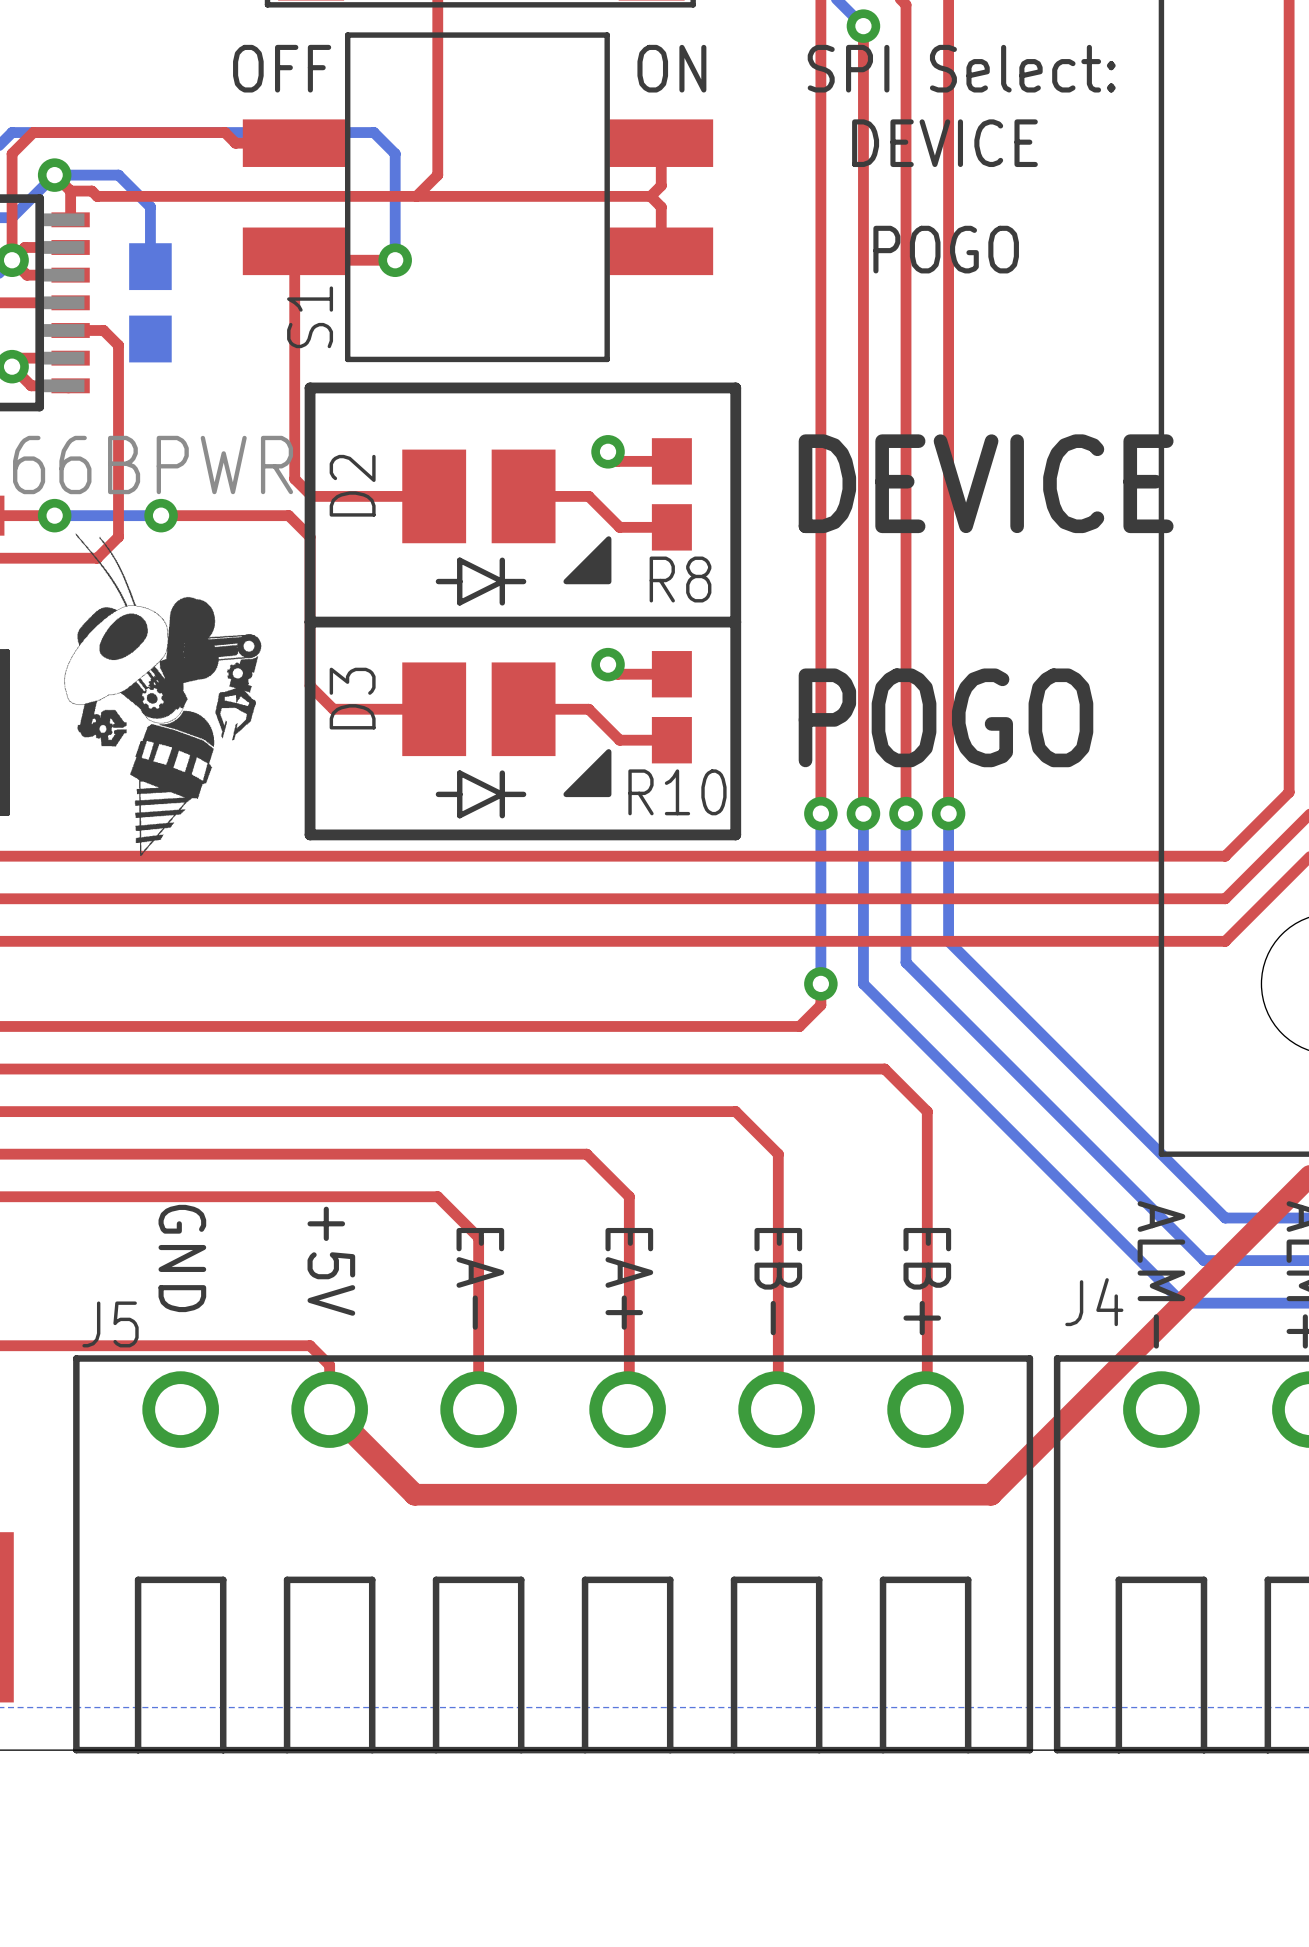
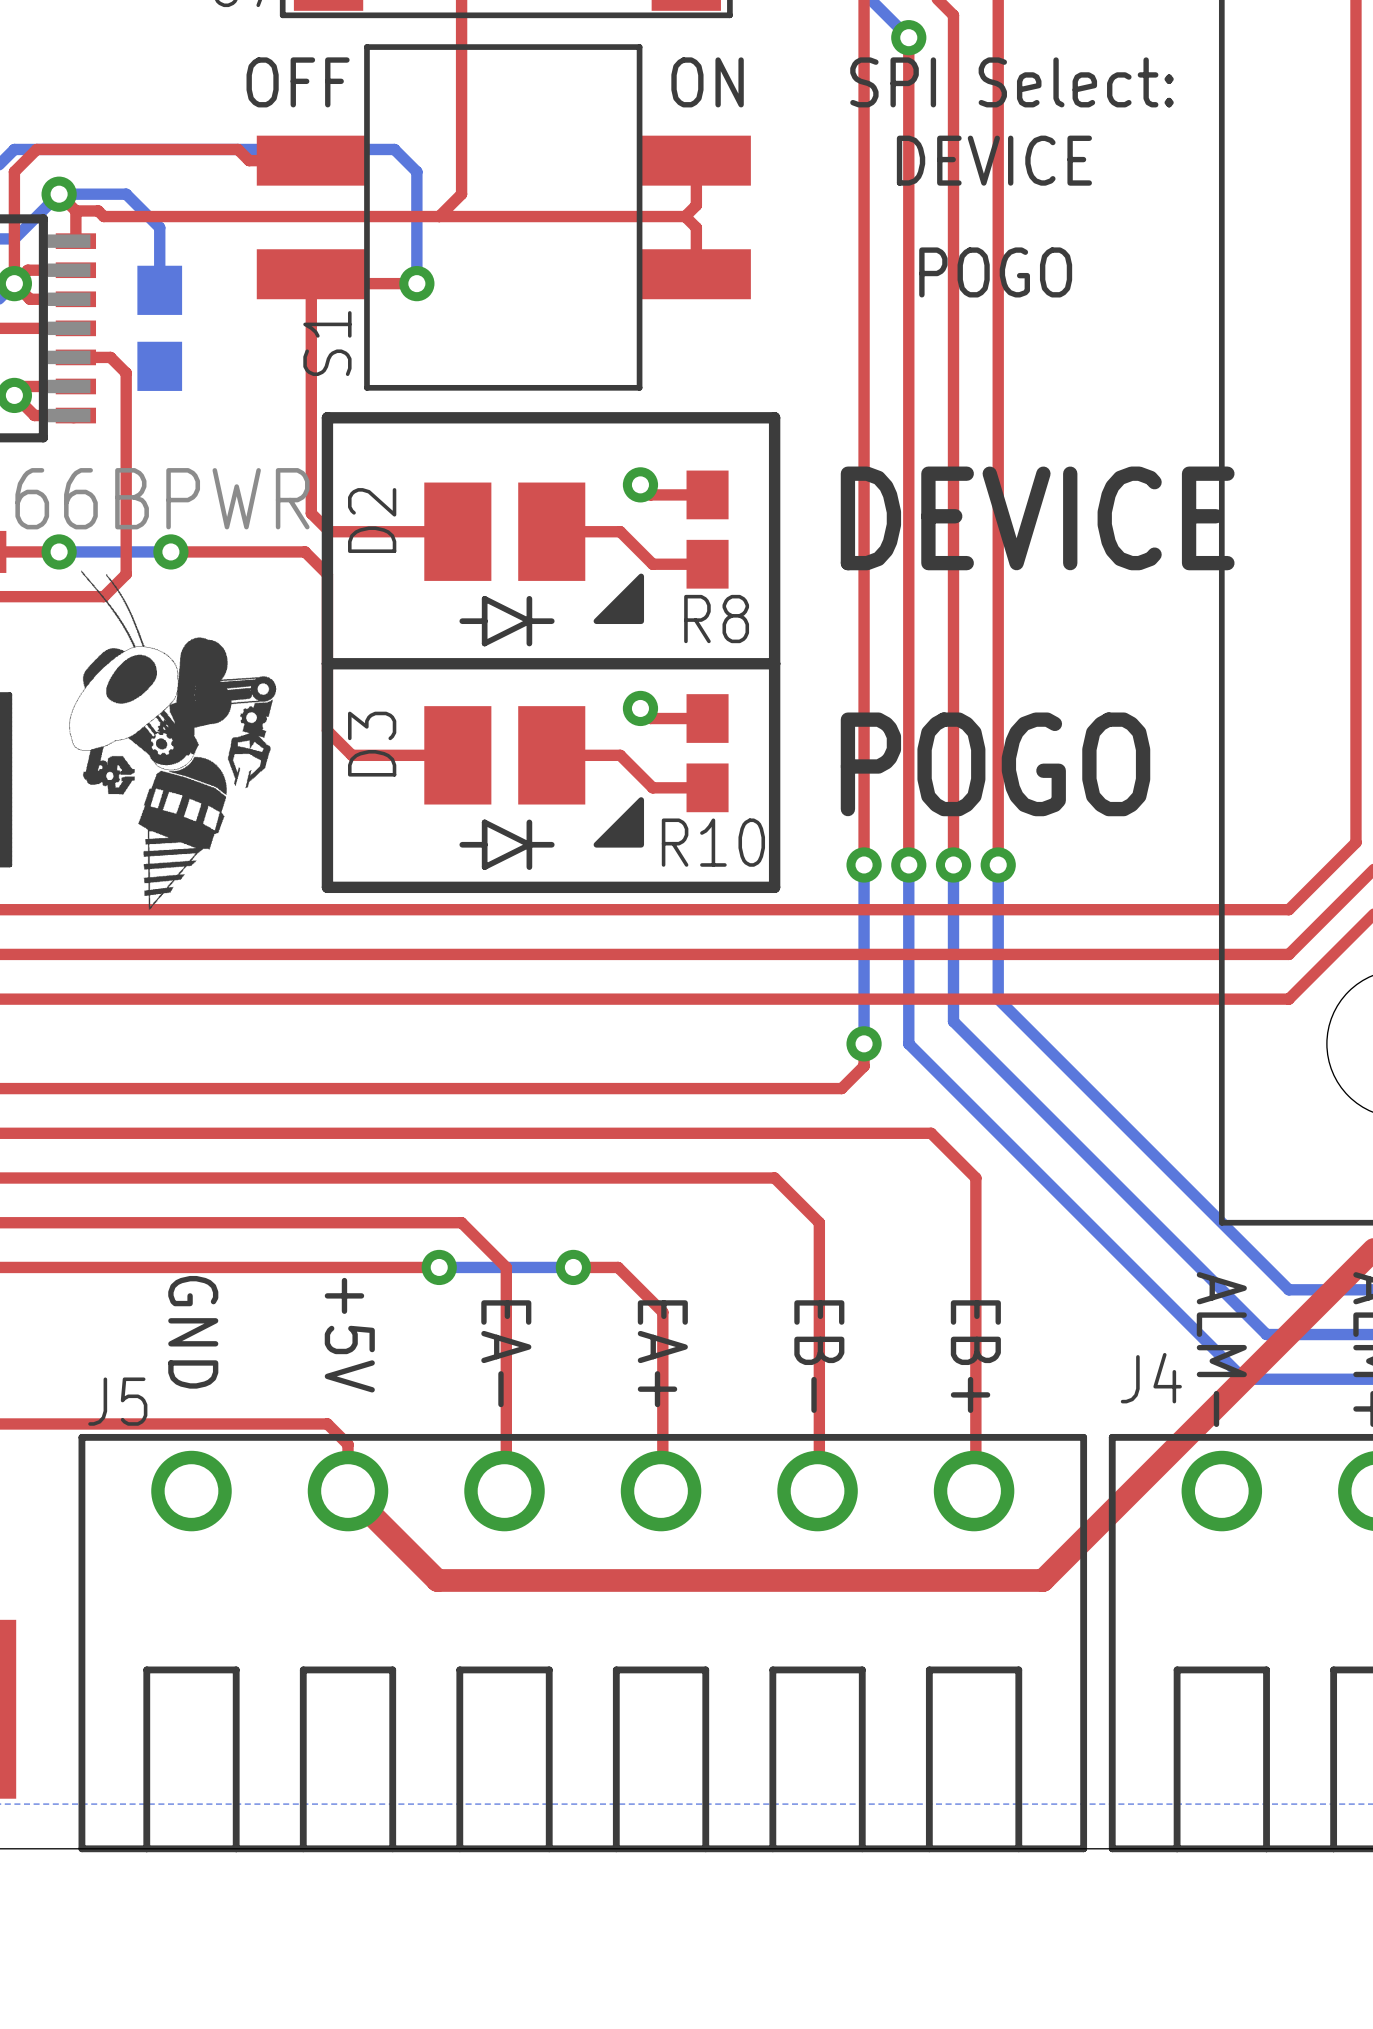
top track: (437, 1154) (586, 1154) (629, 1196) (629, 1239) -> (573, 1267) (618, 1267) (662, 1312)
top track: (416, 1196) (437, 1196) (478, 1237) (478, 1409) -> (461, 1222) (506, 1267) (506, 1489) (504, 1491)
bottom track: none -> (439, 1267) (573, 1267)
via: none -> (439, 1267)
via: none -> (573, 1267)

